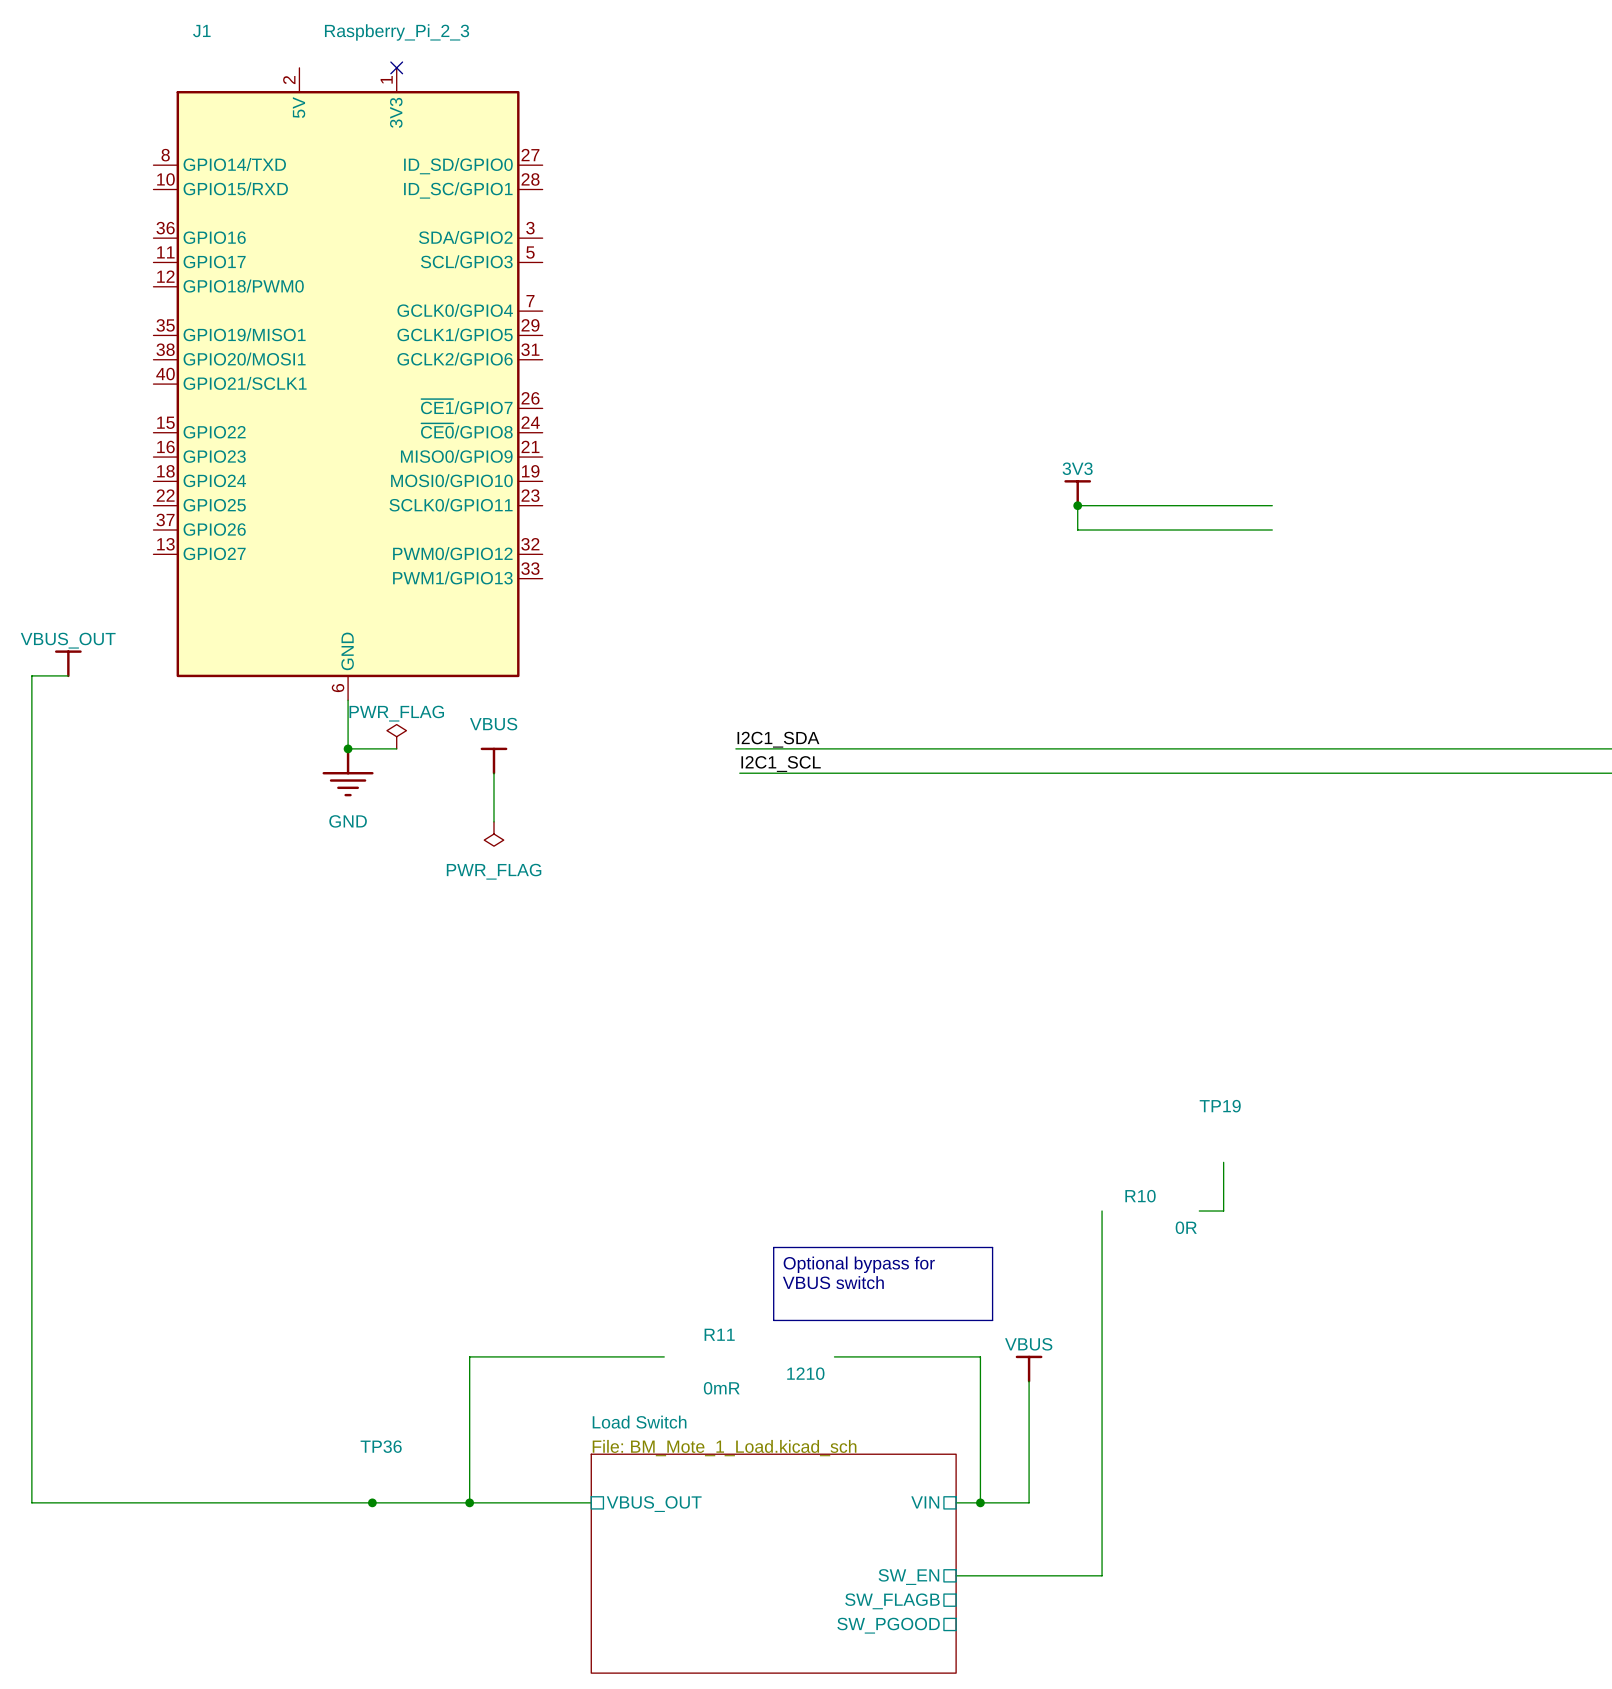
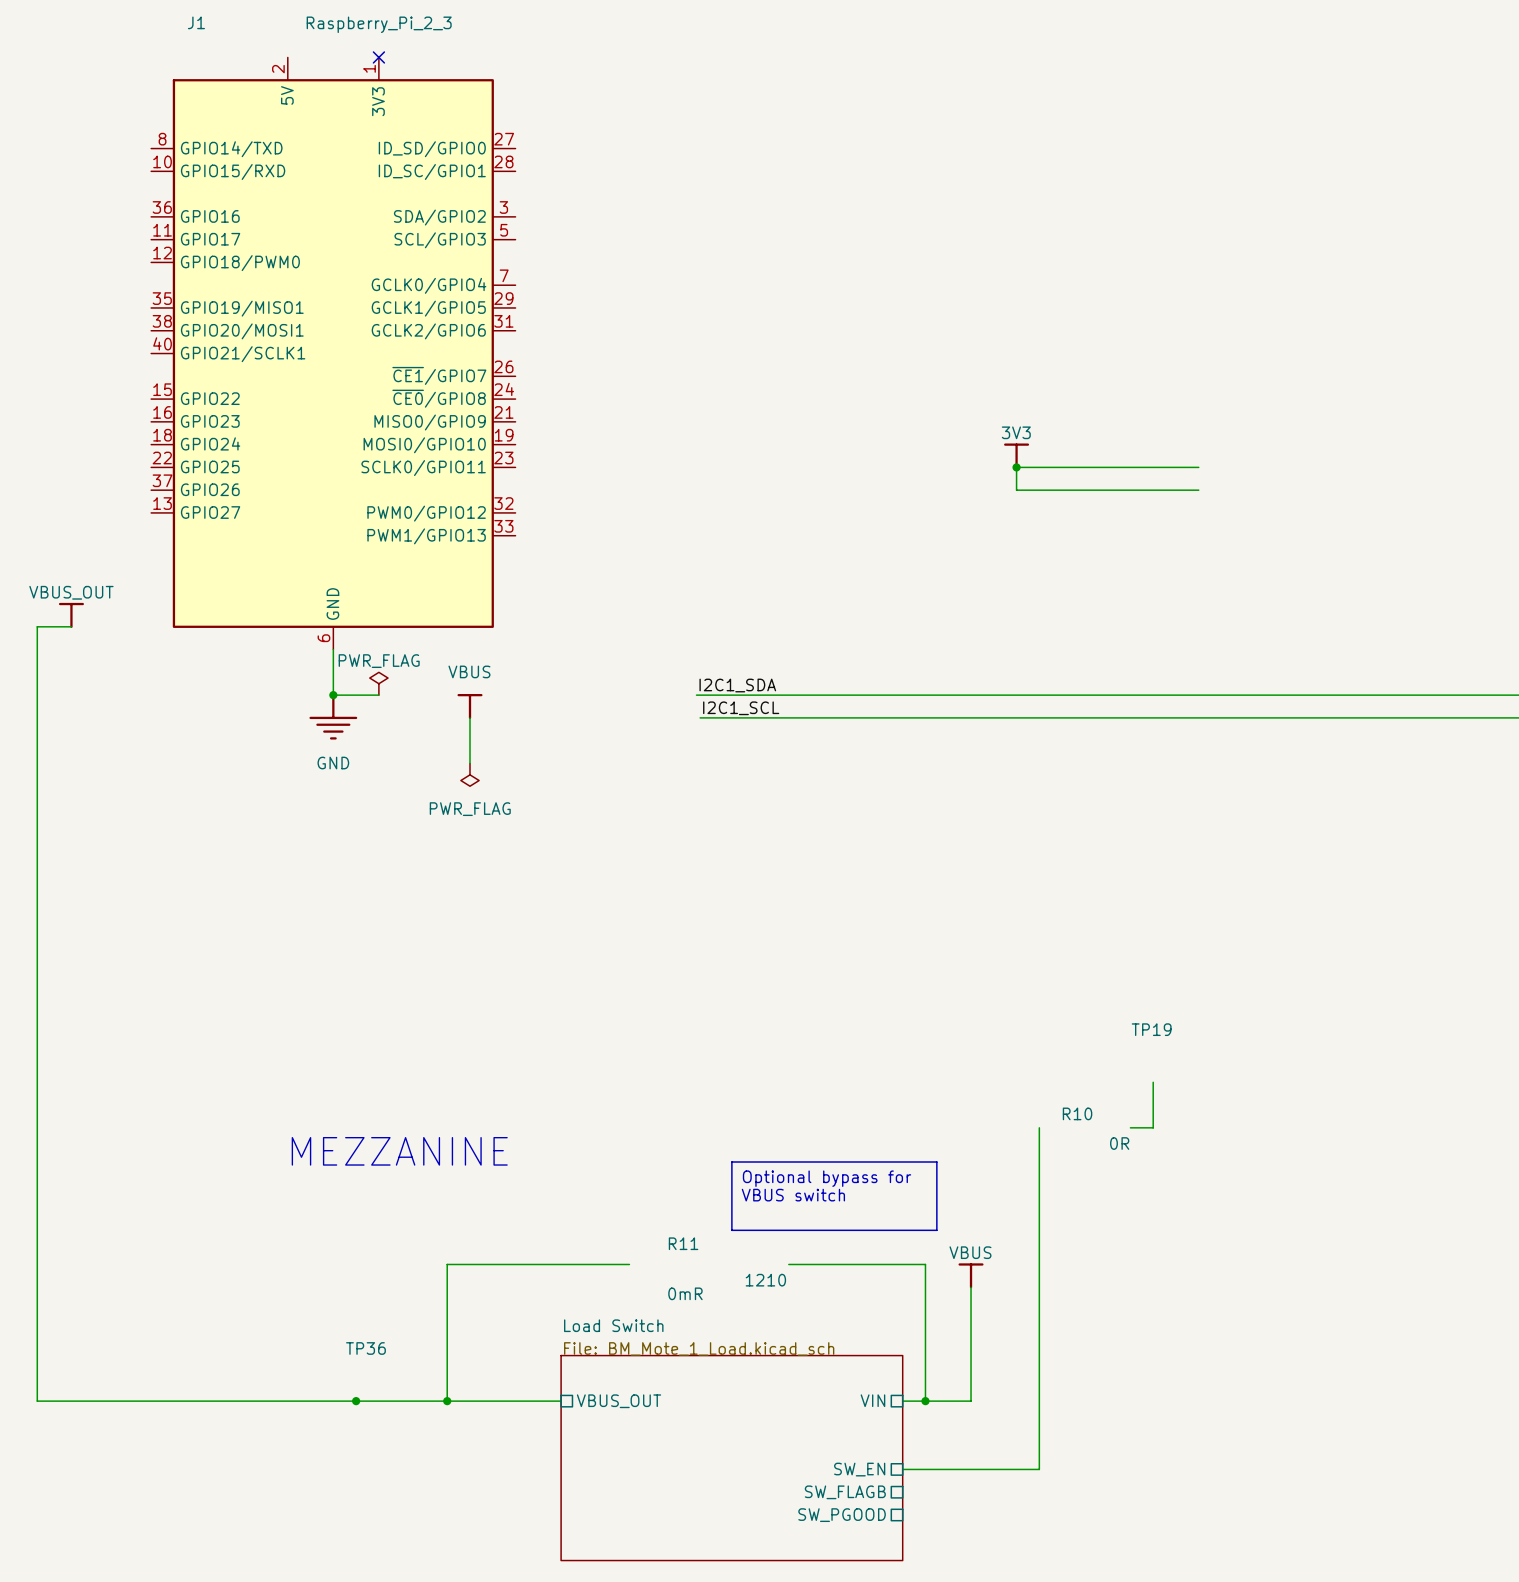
text: none -> MEZZANINE (399, 1151)

